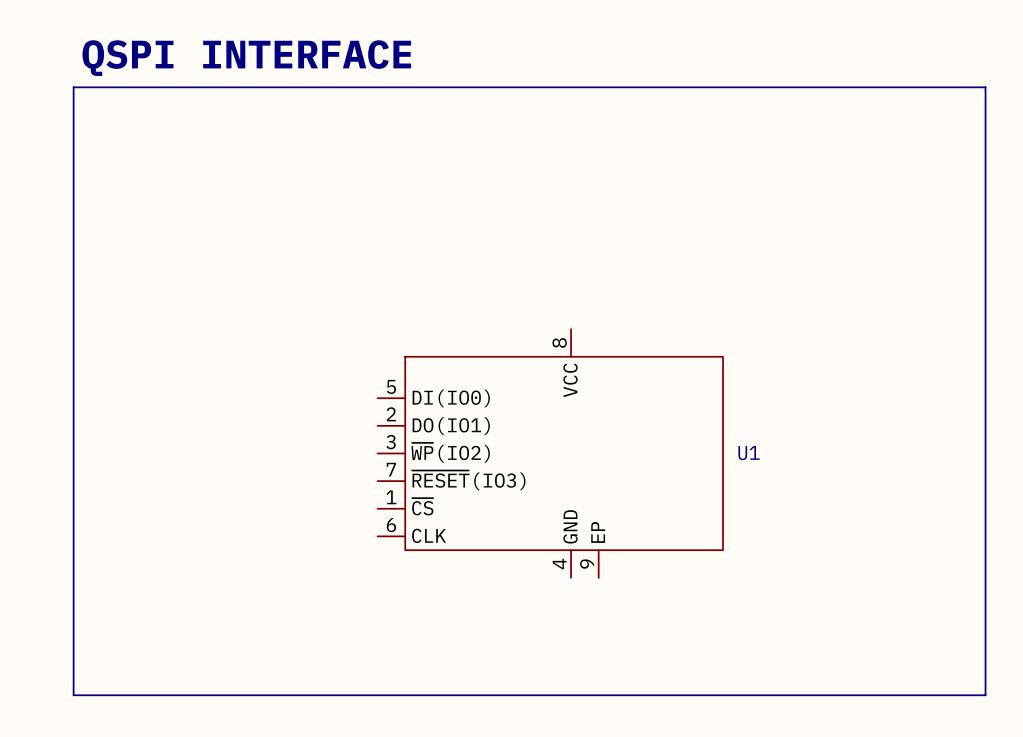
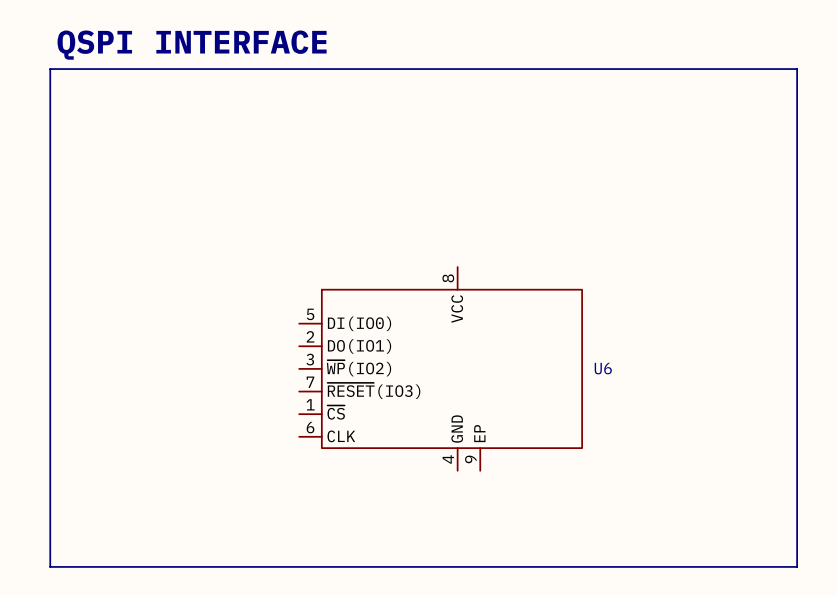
U1 name: U1 (749, 453) -> U6 (603, 368)

